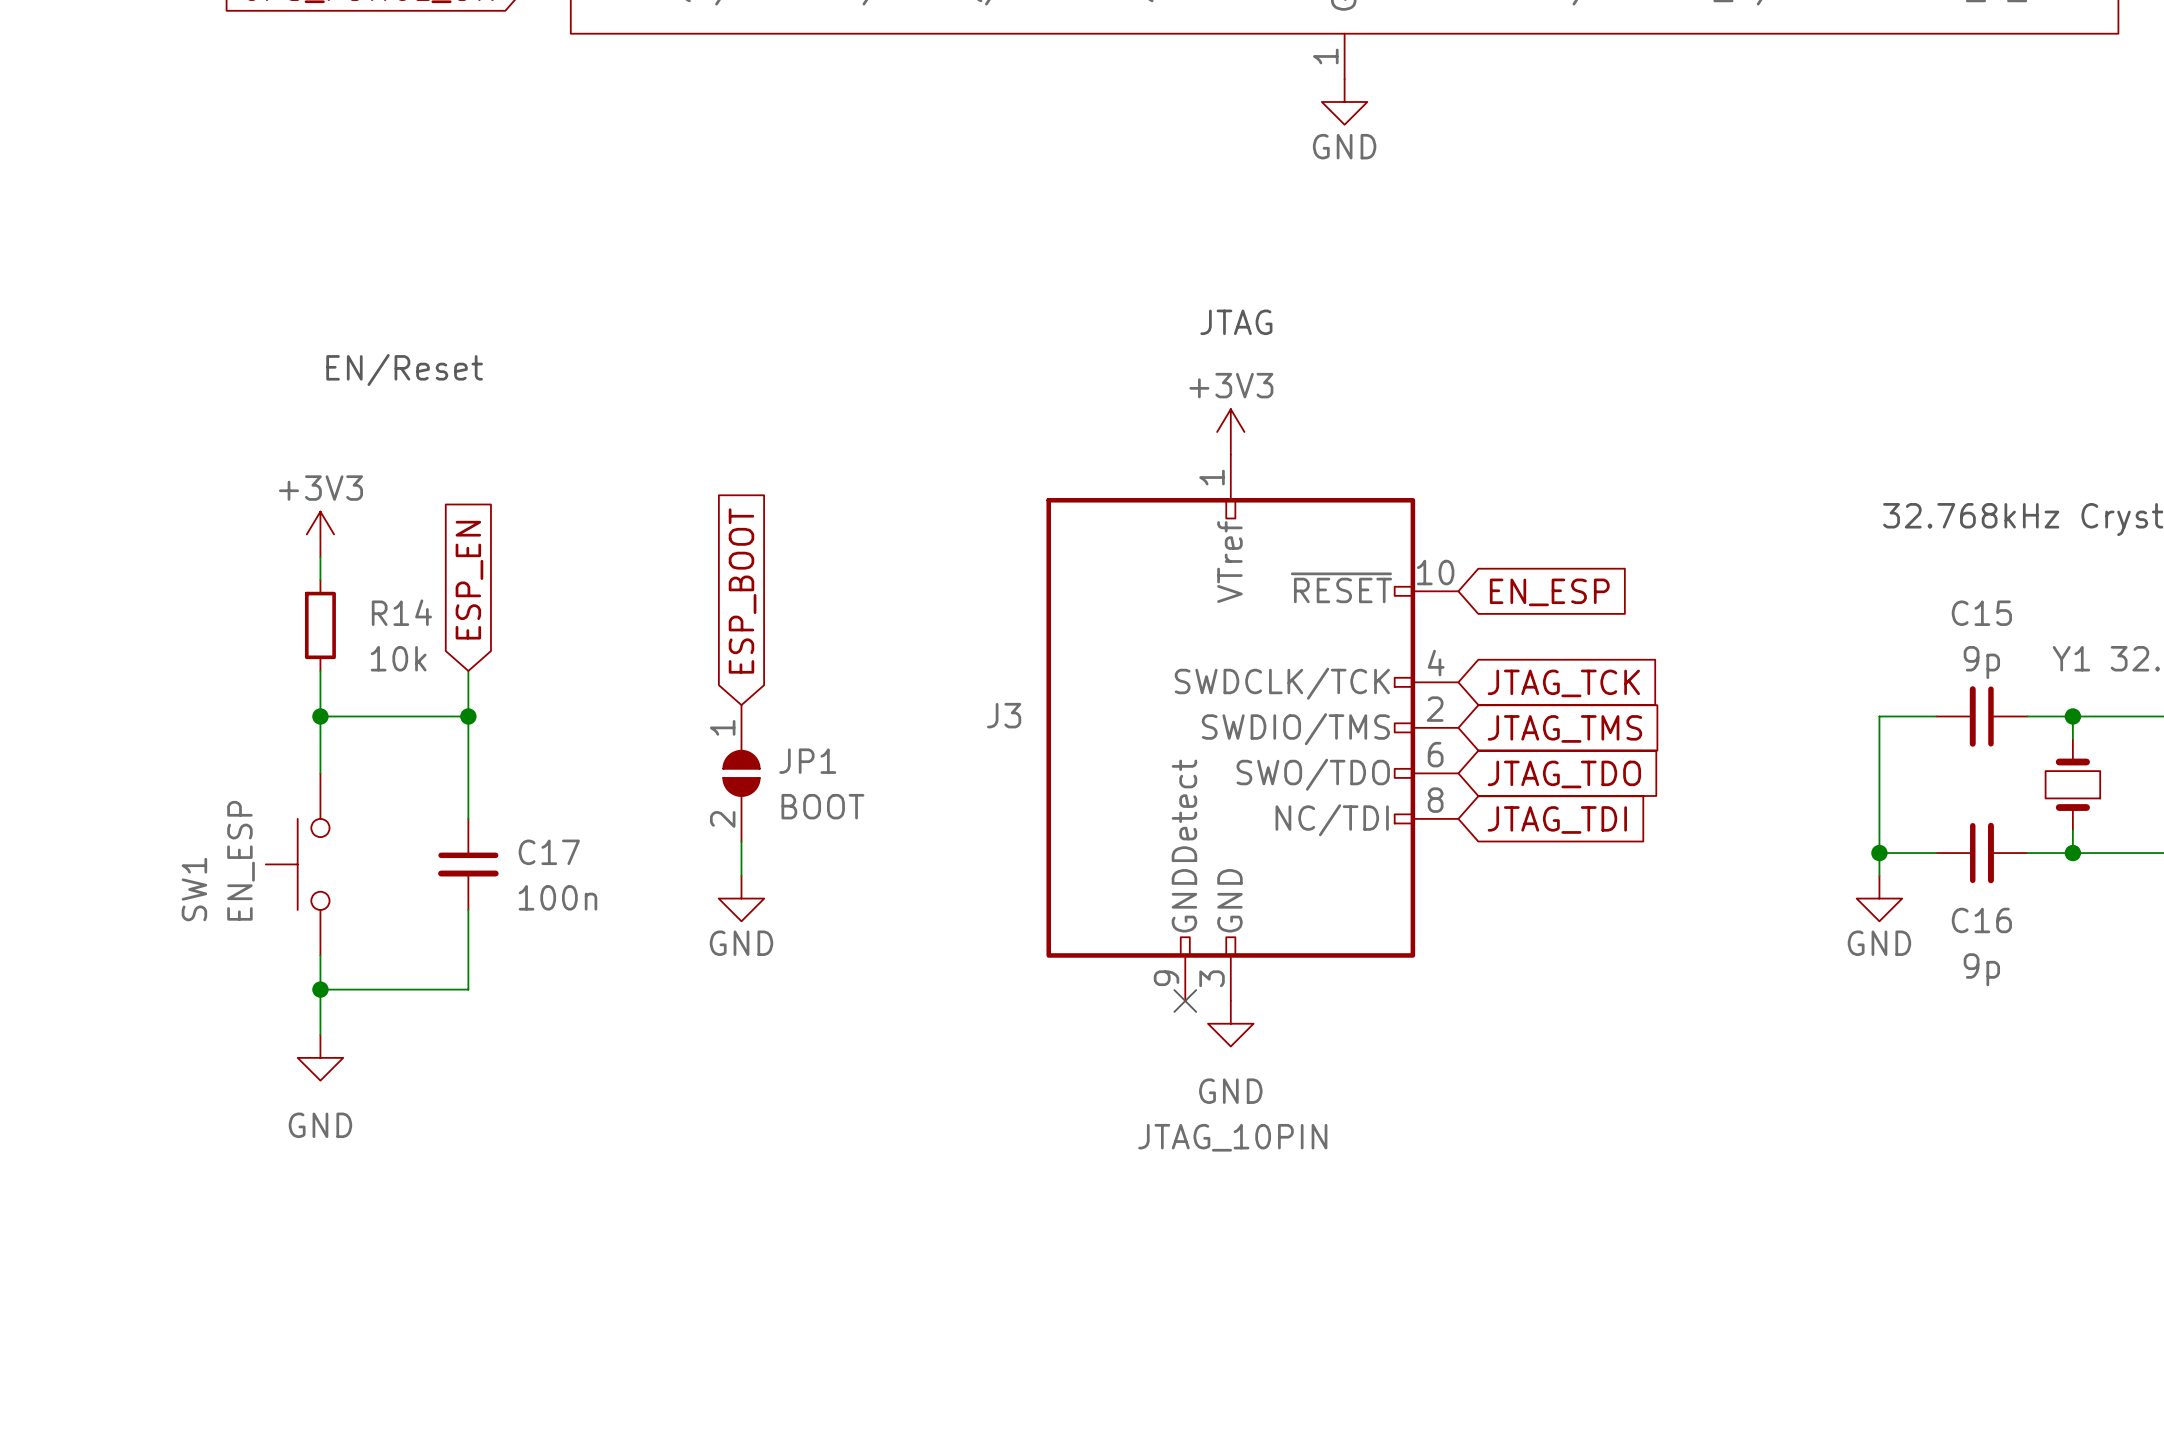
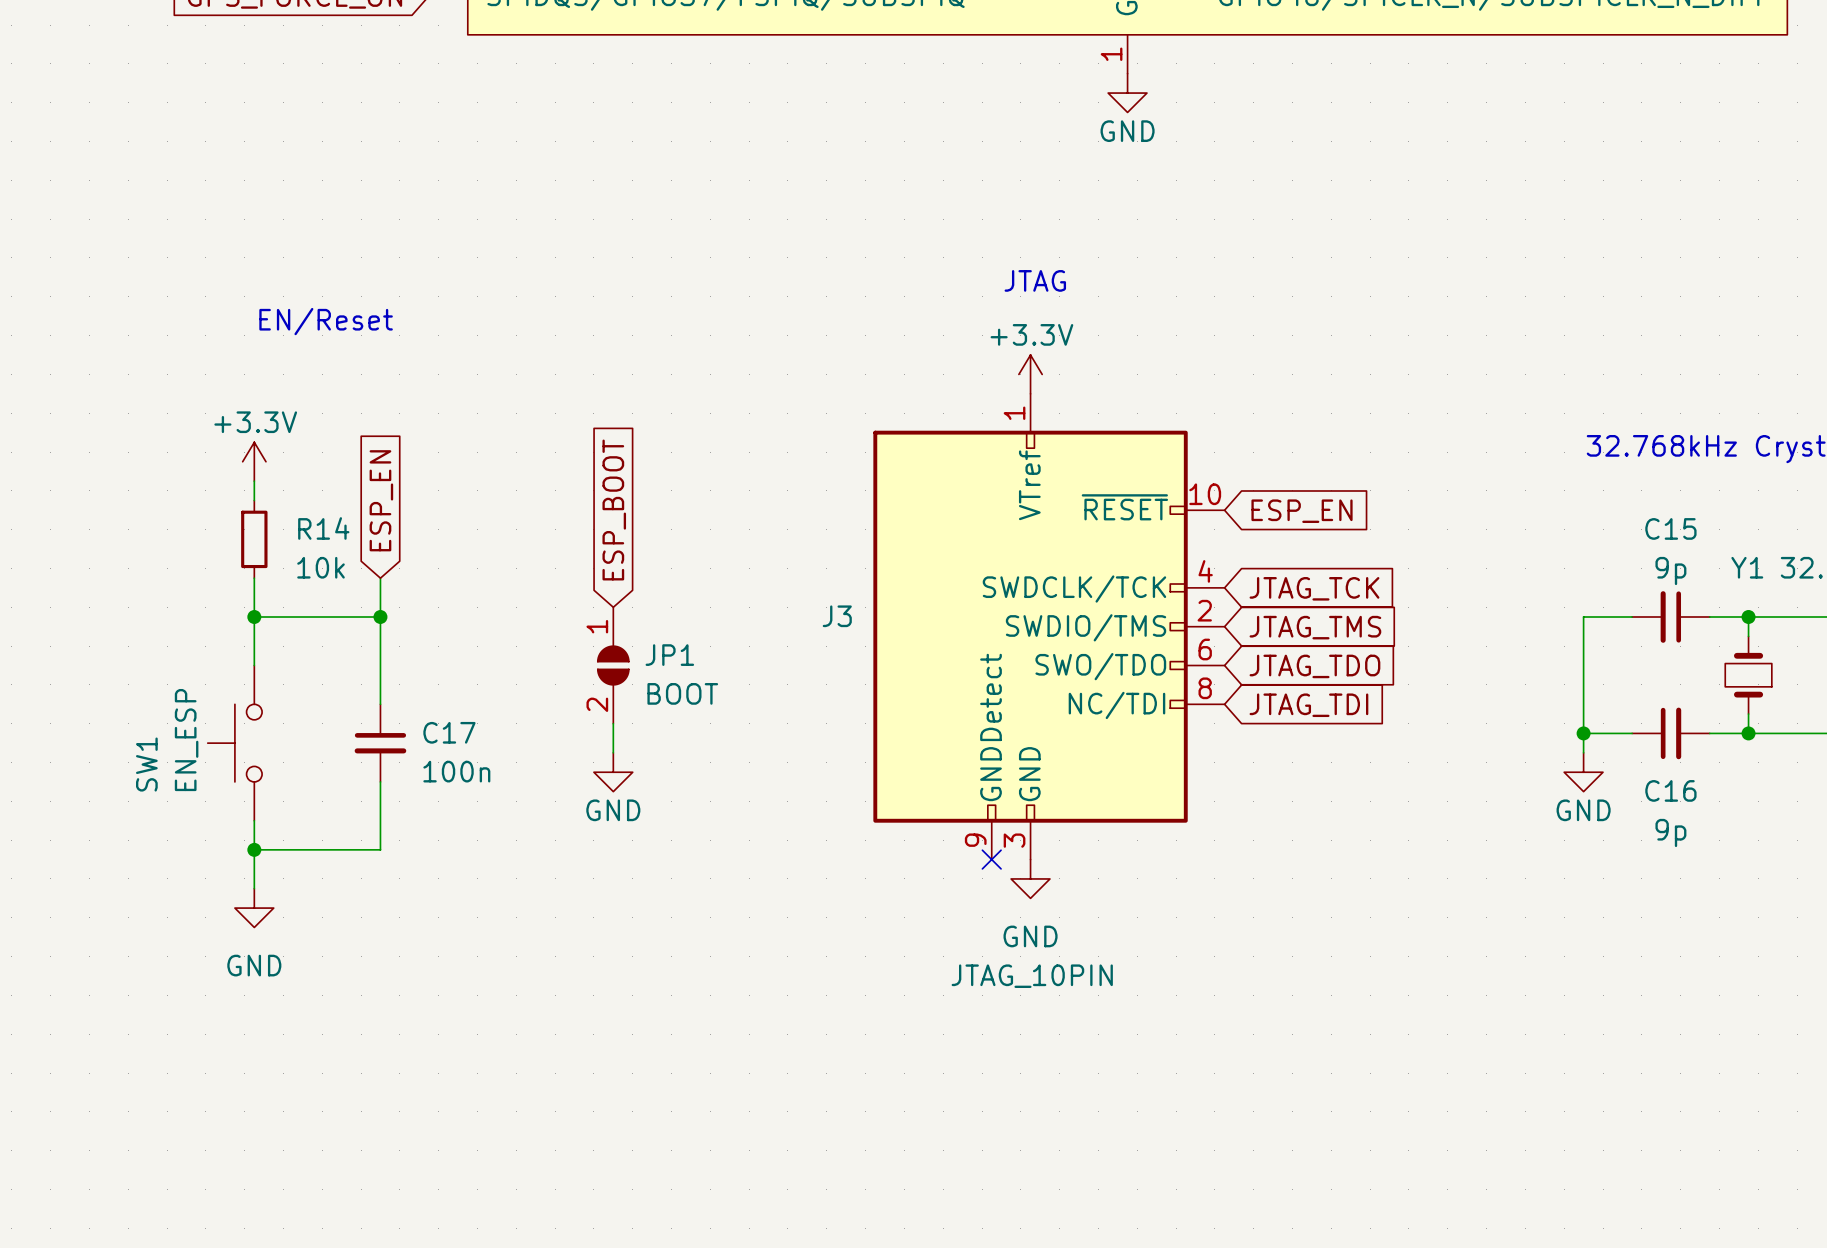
power symbol: +3V3 (1230, 432) -> +3.3V (1030, 374)
power symbol: +3V3 (320, 534) -> +3.3V (254, 461)
global label: EN_ESP (1549, 592) -> ESP_EN (1302, 511)

